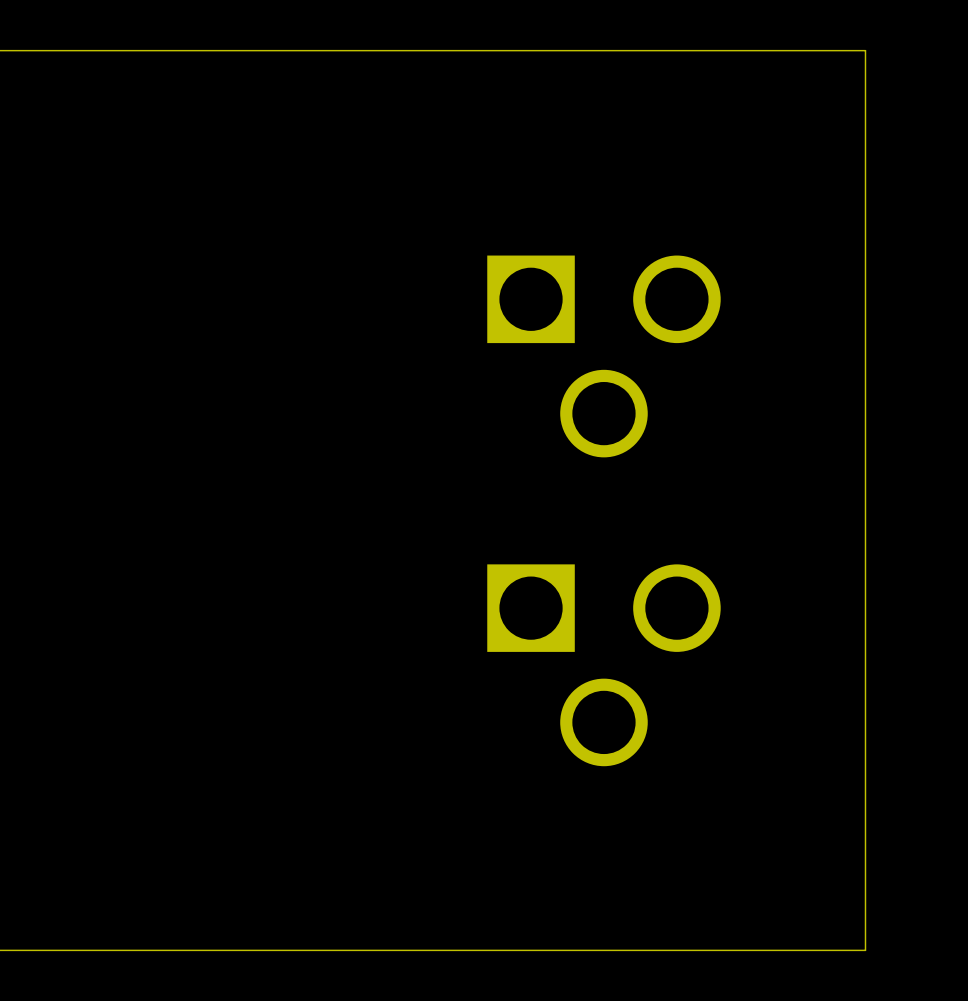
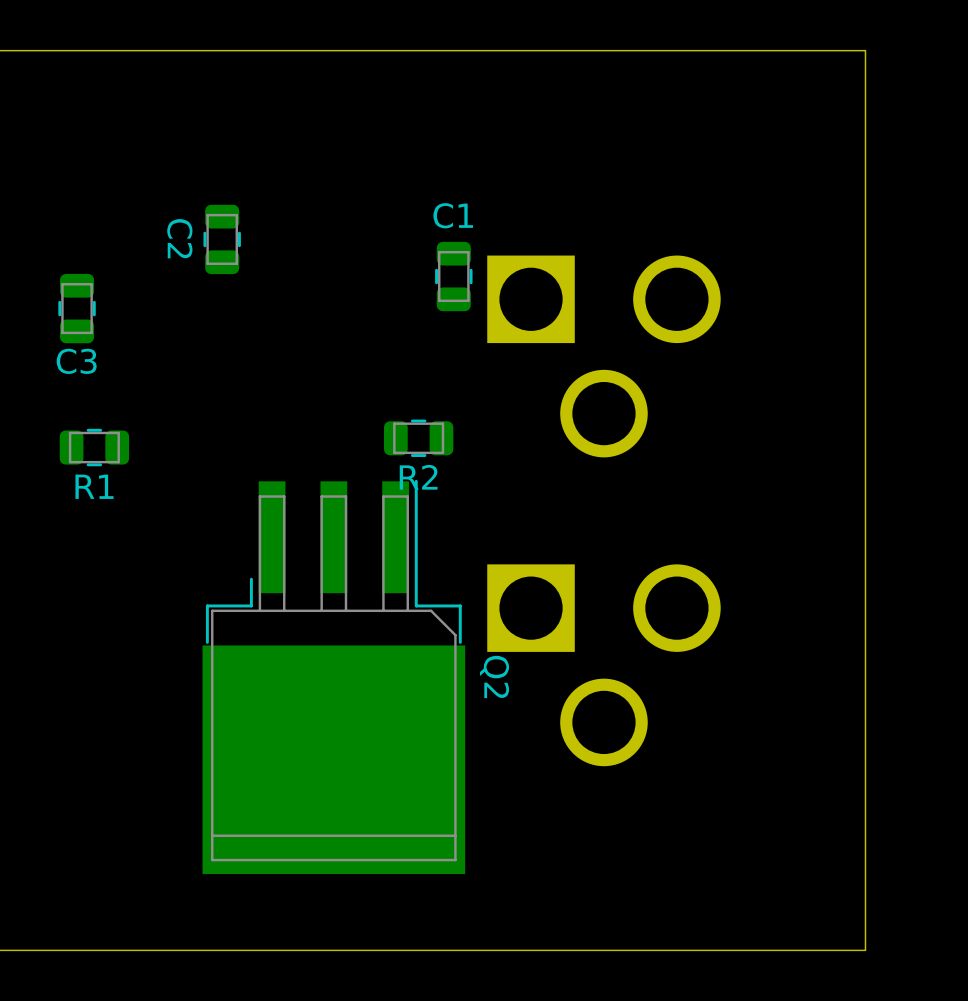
C2: none -> (222, 239)
C1: none -> (453, 276)
C3: none -> (77, 308)
R2: none -> (418, 438)
R1: none -> (94, 447)
Q2: none -> (333, 676)

